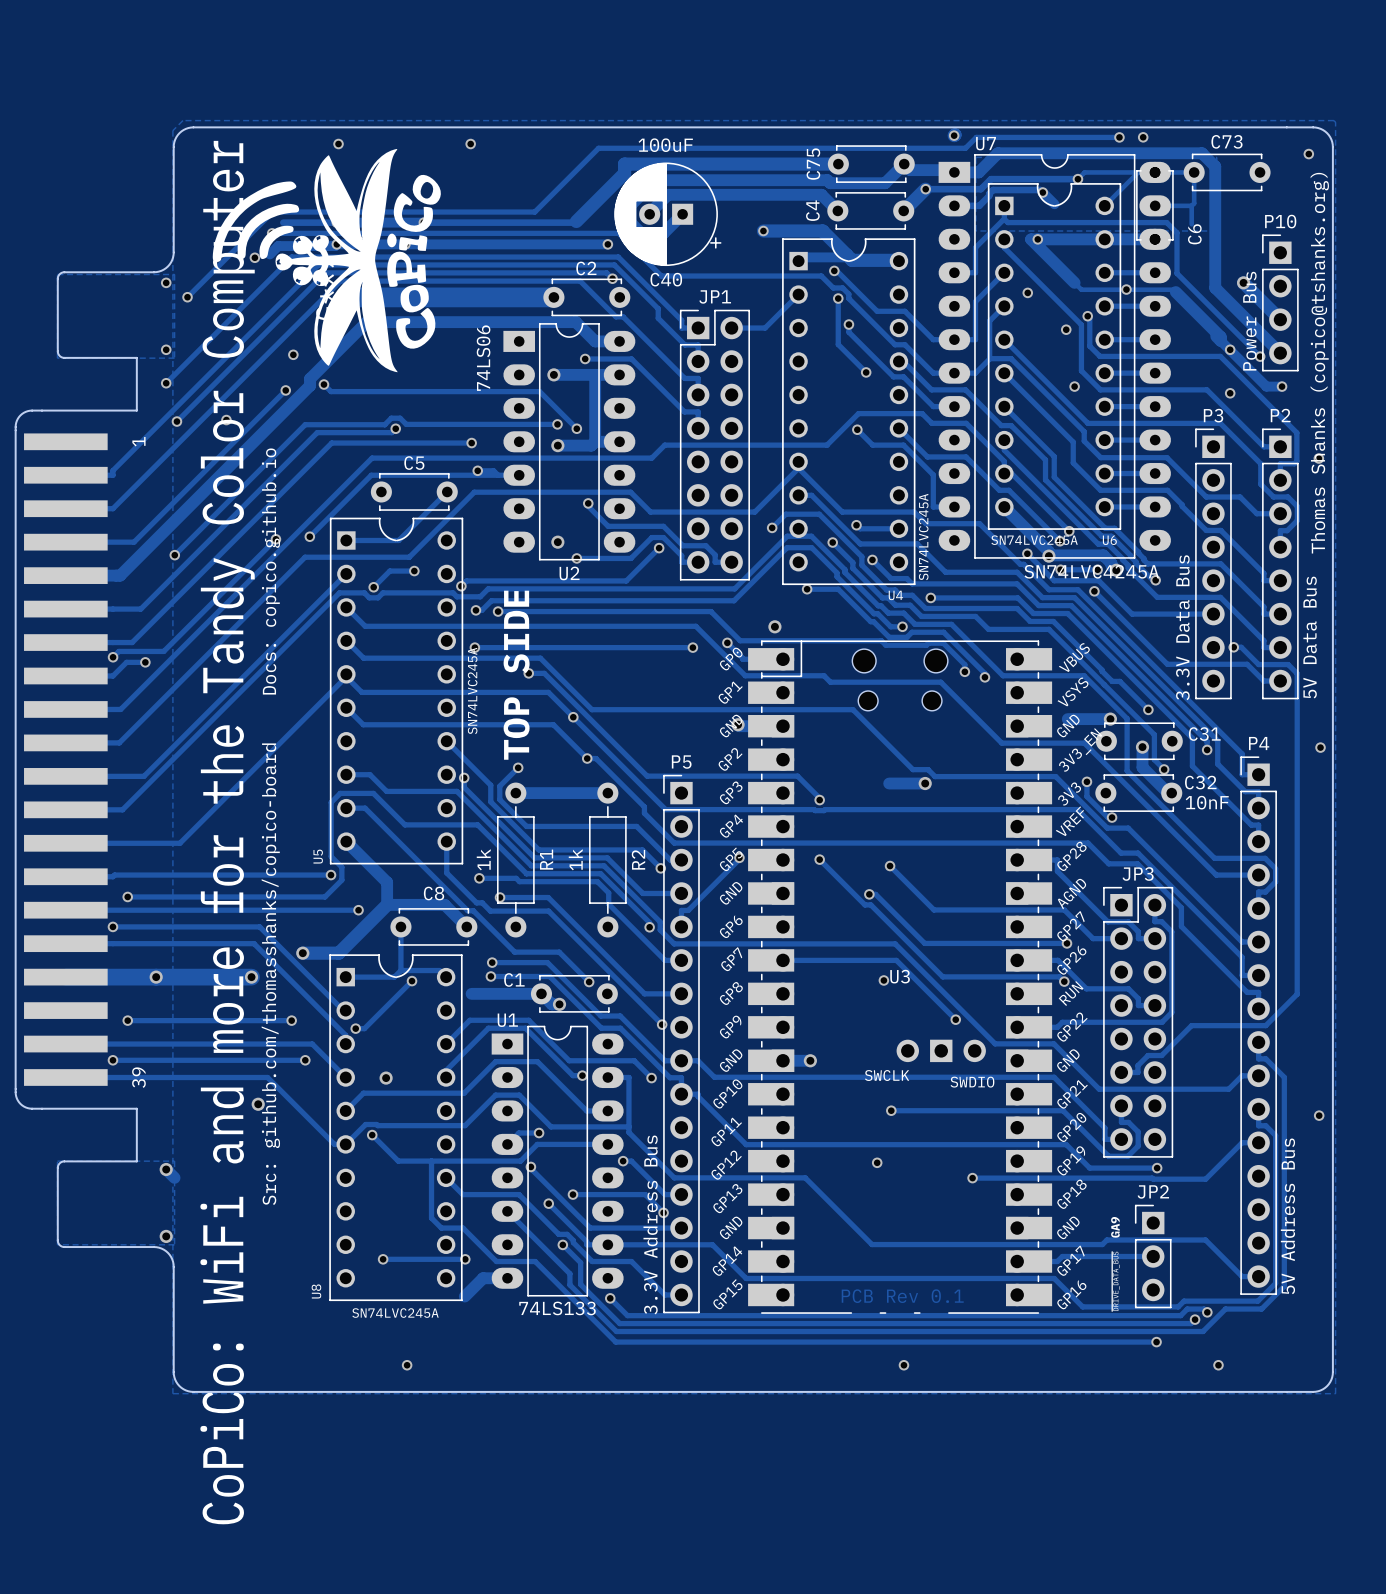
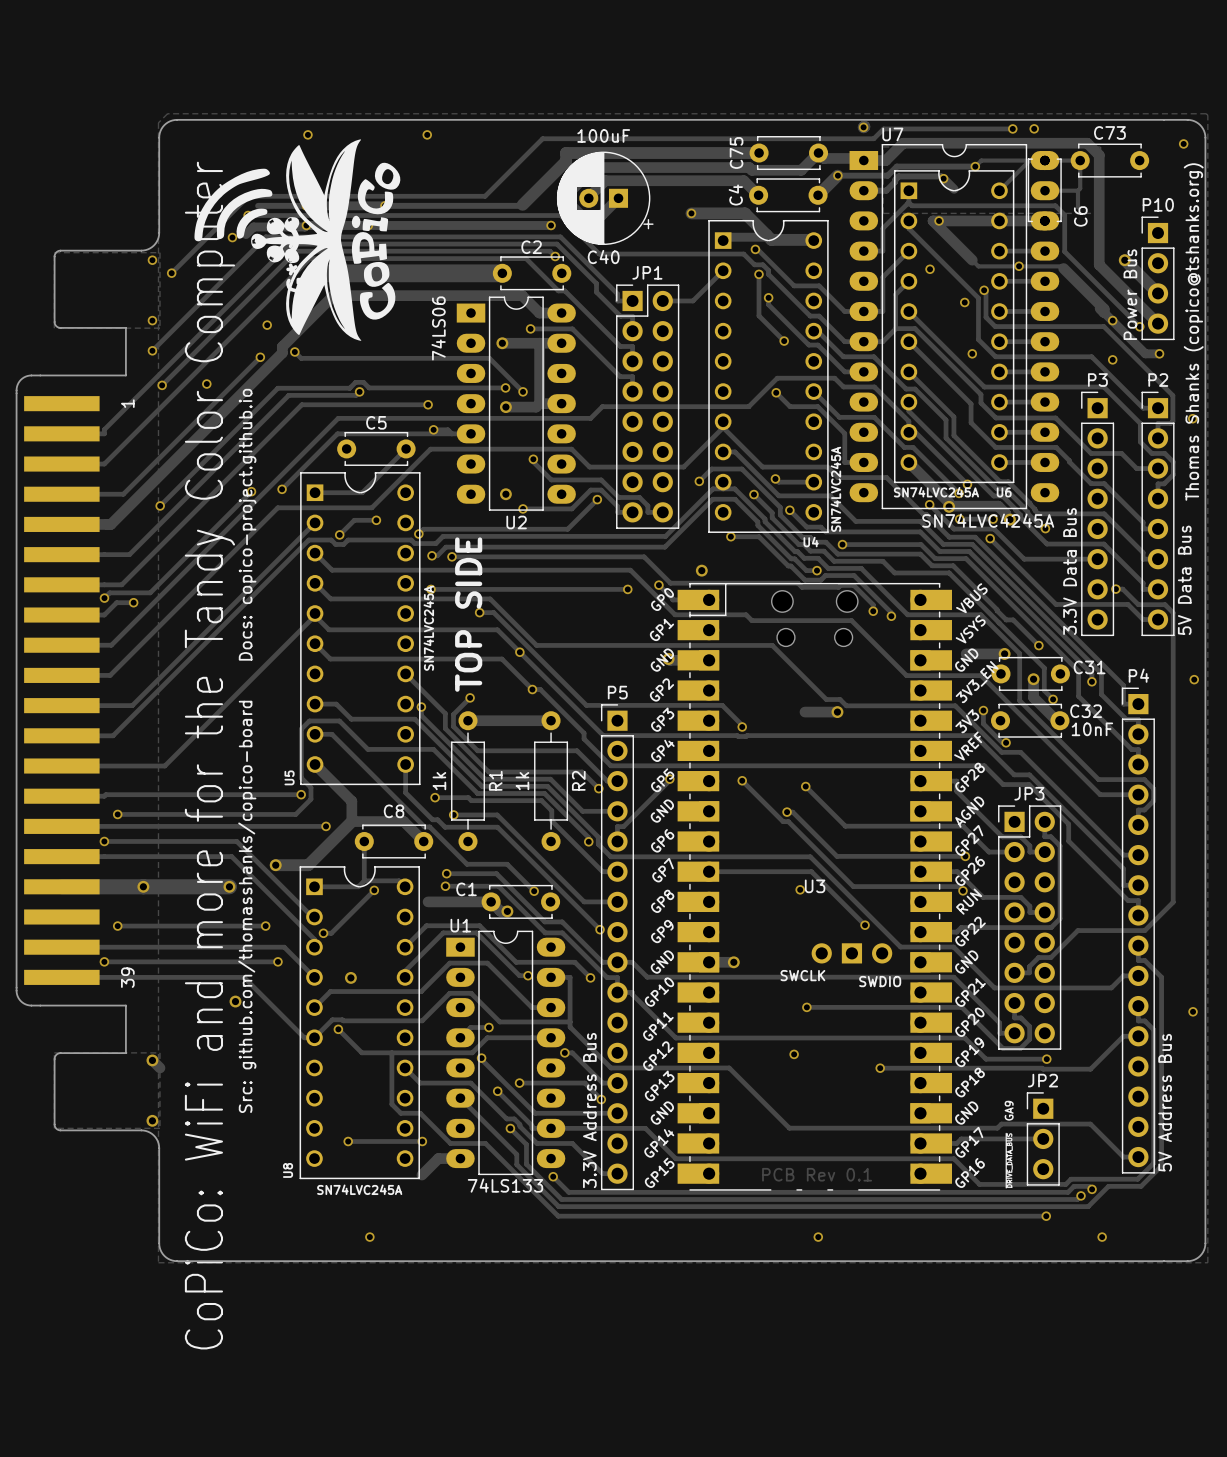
text: Src: github.com/thomasshanks/copico-board Docs: copico.github.io (270, 826) -> Src: github.com/thomasshanks/copico-board Docs: copico-project.github.io (247, 750)

